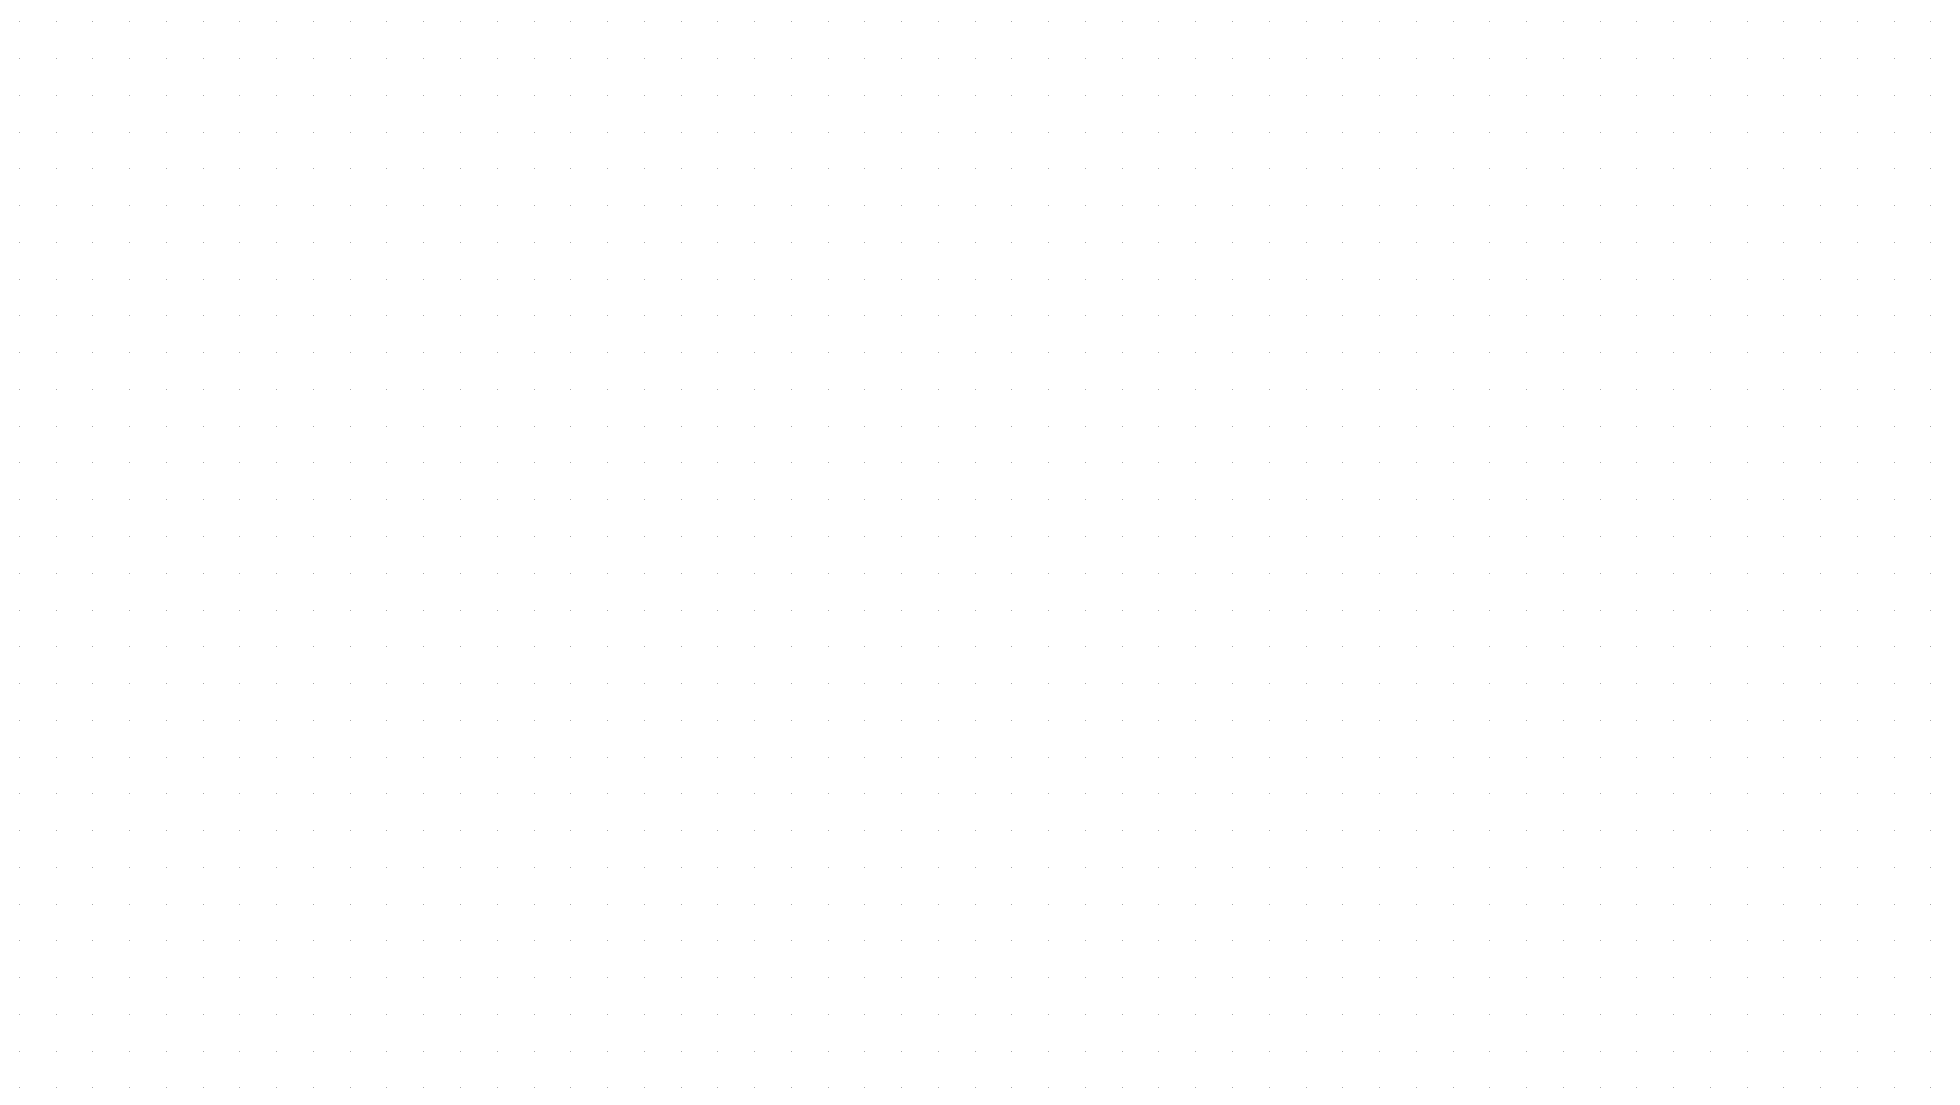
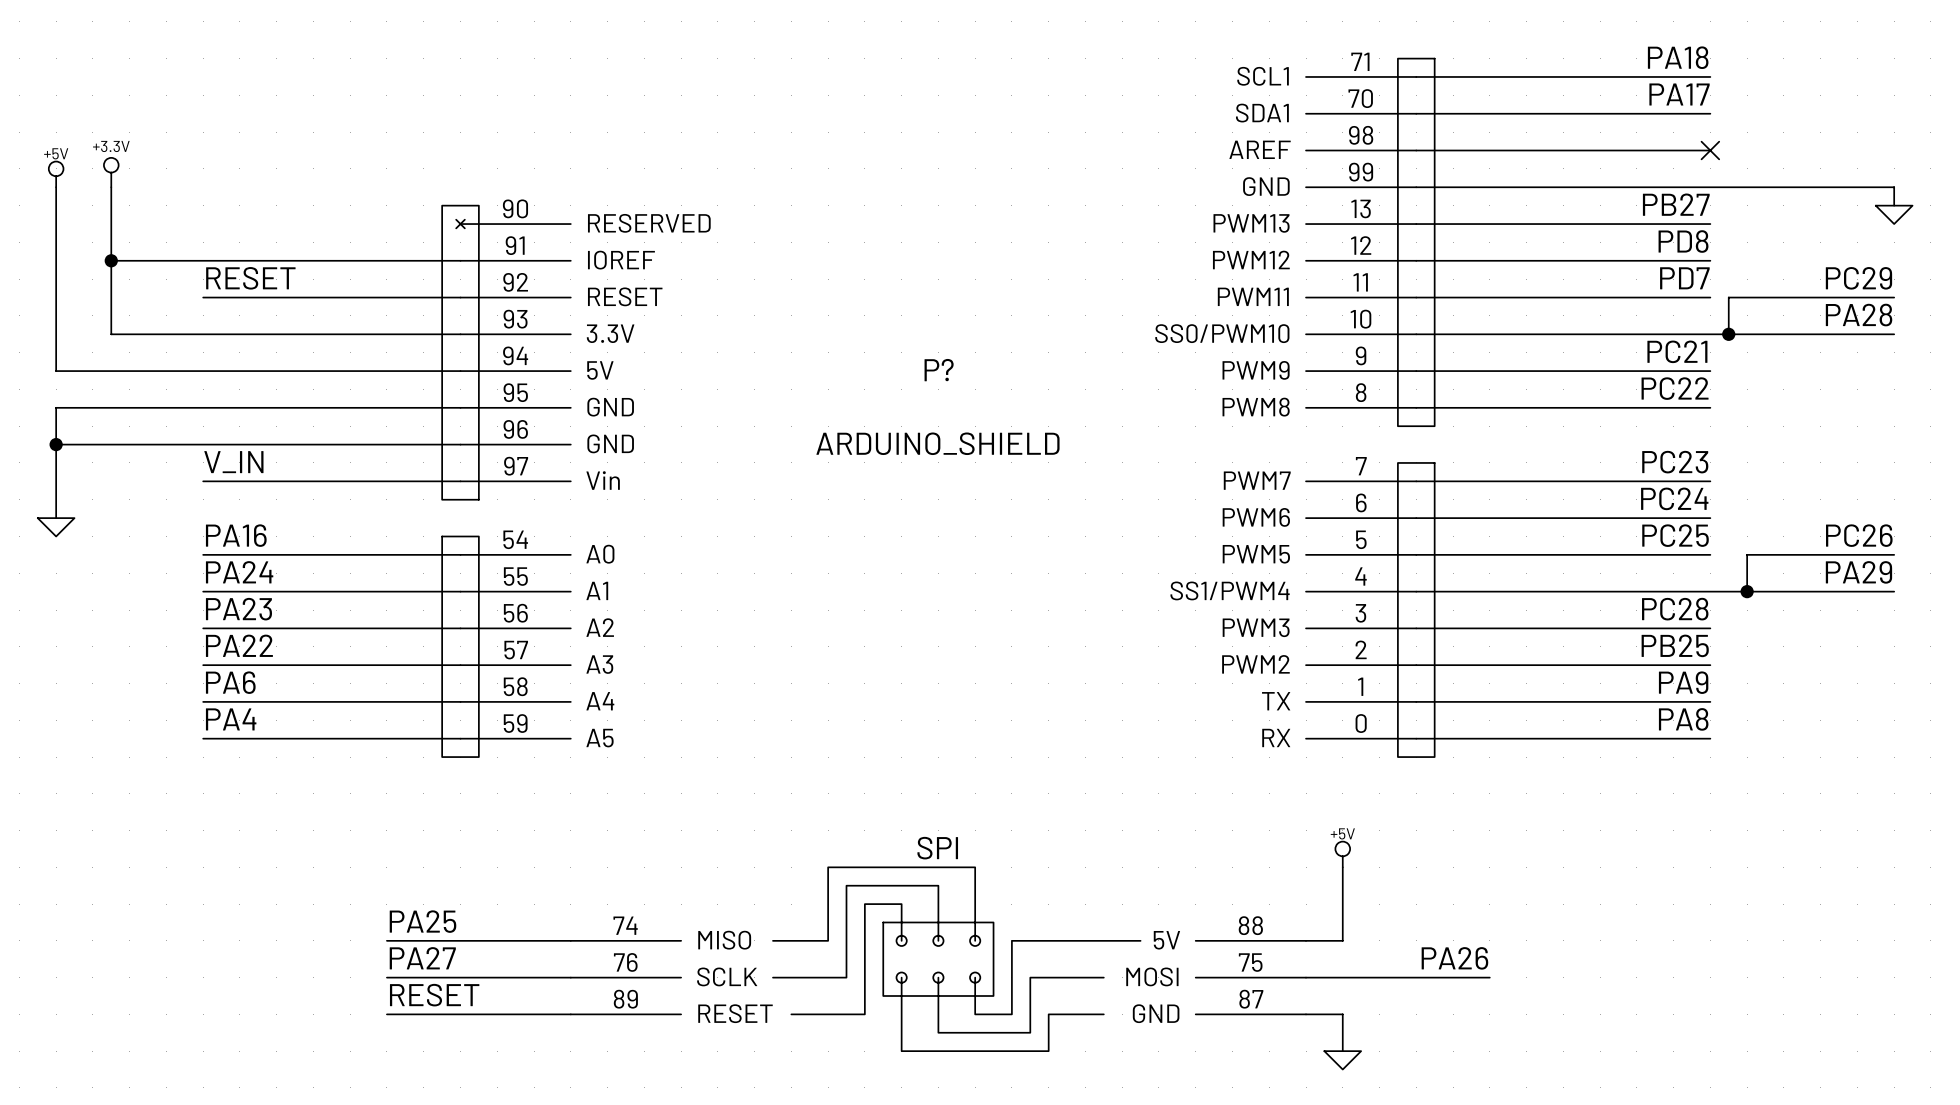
label: none -> PA18 (1678, 57)
wire: none -> (1416, 76) (1710, 76)
label: none -> PA17 (1679, 94)
wire: none -> (1416, 113) (1710, 113)
wire: none -> (1416, 150) (1710, 150)
no-connect mark: none -> (1710, 150)
power symbol: none -> +3.3V (111, 172)
power symbol: none -> +5V (56, 174)
wire: none -> (56, 187) (56, 371) (460, 371)
wire: none -> (111, 187) (111, 334) (460, 334)
wire: none -> (1416, 187) (1894, 187) (1894, 205)
label: none -> PB27 (1676, 204)
power symbol: none -> (1894, 214)
wire: none -> (1416, 224) (1710, 224)
label: none -> PD8 (1683, 241)
wire: none -> (111, 260) (460, 260)
junction: none -> (111, 260)
wire: none -> (1416, 260) (1710, 260)
label: none -> RESET (250, 278)
label: none -> PD7 (1684, 278)
label: none -> PC29 (1858, 278)
wire: none -> (203, 297) (460, 297)
wire: none -> (1416, 297) (1710, 297)
wire: none -> (1894, 297) (1728, 297) (1728, 334)
label: none -> PA28 (1859, 315)
wire: none -> (1416, 334) (1894, 334)
junction: none -> (1728, 334)
label: none -> PC21 (1677, 351)
wire: none -> (1416, 371) (1710, 371)
label: none -> PC22 (1675, 388)
wire: none -> (460, 407) (56, 407) (56, 518)
wire: none -> (1416, 407) (1710, 407)
wire: none -> (56, 444) (460, 444)
junction: none -> (56, 444)
label: none -> V_IN (233, 462)
label: none -> PC23 (1675, 462)
wire: none -> (203, 481) (460, 481)
wire: none -> (1416, 481) (1710, 481)
label: none -> PC24 (1674, 498)
wire: none -> (1416, 518) (1710, 518)
power symbol: none -> (56, 527)
label: none -> PA16 (236, 535)
label: none -> PC25 (1675, 535)
label: none -> PC26 (1859, 535)
wire: none -> (203, 554) (460, 554)
P?: none -> ARDUINO_SHIELD (938, 554)
wire: none -> (1416, 554) (1710, 554)
wire: none -> (1894, 554) (1747, 554) (1747, 591)
label: none -> PA24 (239, 572)
label: none -> PA29 (1858, 572)
wire: none -> (203, 591) (460, 591)
wire: none -> (1416, 591) (1894, 591)
junction: none -> (1747, 591)
label: none -> PA23 (238, 609)
label: none -> PC28 (1675, 609)
wire: none -> (203, 628) (460, 628)
wire: none -> (1416, 628) (1710, 628)
label: none -> PA22 (239, 645)
label: none -> PB25 (1675, 645)
wire: none -> (203, 665) (460, 665)
wire: none -> (1416, 665) (1710, 665)
label: none -> PA6 (230, 682)
label: none -> PA9 (1683, 682)
wire: none -> (203, 701) (460, 701)
wire: none -> (1416, 701) (1710, 701)
label: none -> PA4 (231, 719)
label: none -> PA8 (1683, 719)
wire: none -> (203, 738) (460, 738)
wire: none -> (1416, 738) (1710, 738)
power symbol: none -> +5V (1342, 854)
wire: none -> (1342, 867) (1342, 940) (1306, 940)
label: none -> PA25 (423, 921)
wire: none -> (386, 940) (570, 940)
label: none -> PA27 (422, 958)
label: none -> PA26 (1454, 958)
wire: none -> (386, 977) (570, 977)
wire: none -> (1306, 977) (1489, 977)
label: none -> RESET (434, 995)
wire: none -> (386, 1014) (570, 1014)
wire: none -> (1306, 1014) (1342, 1014) (1342, 1051)
power symbol: none -> (1342, 1060)

